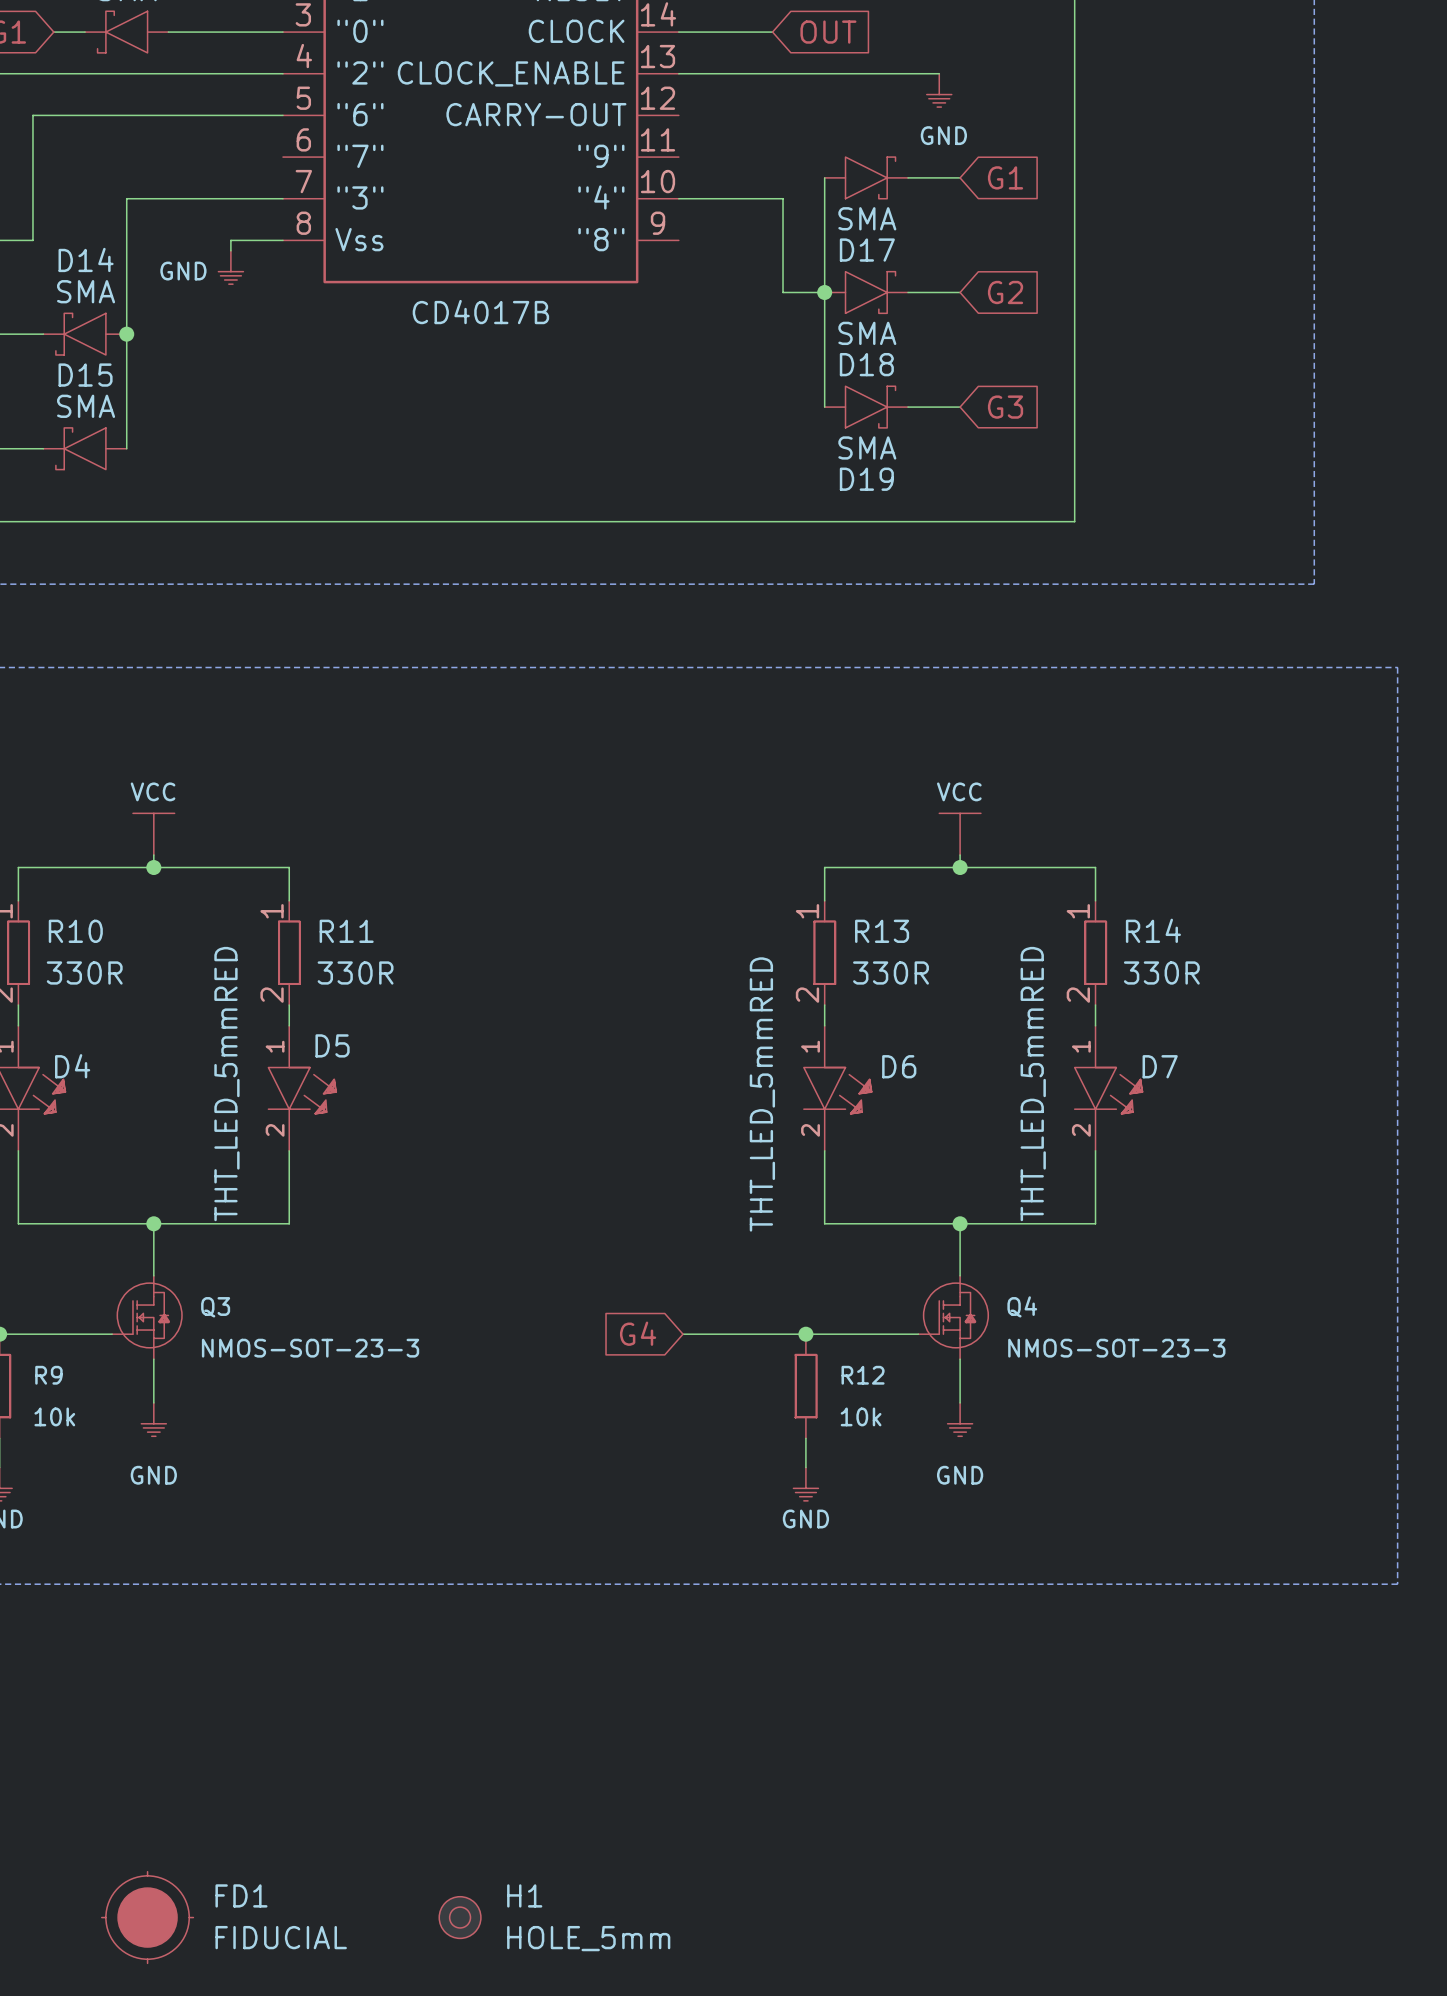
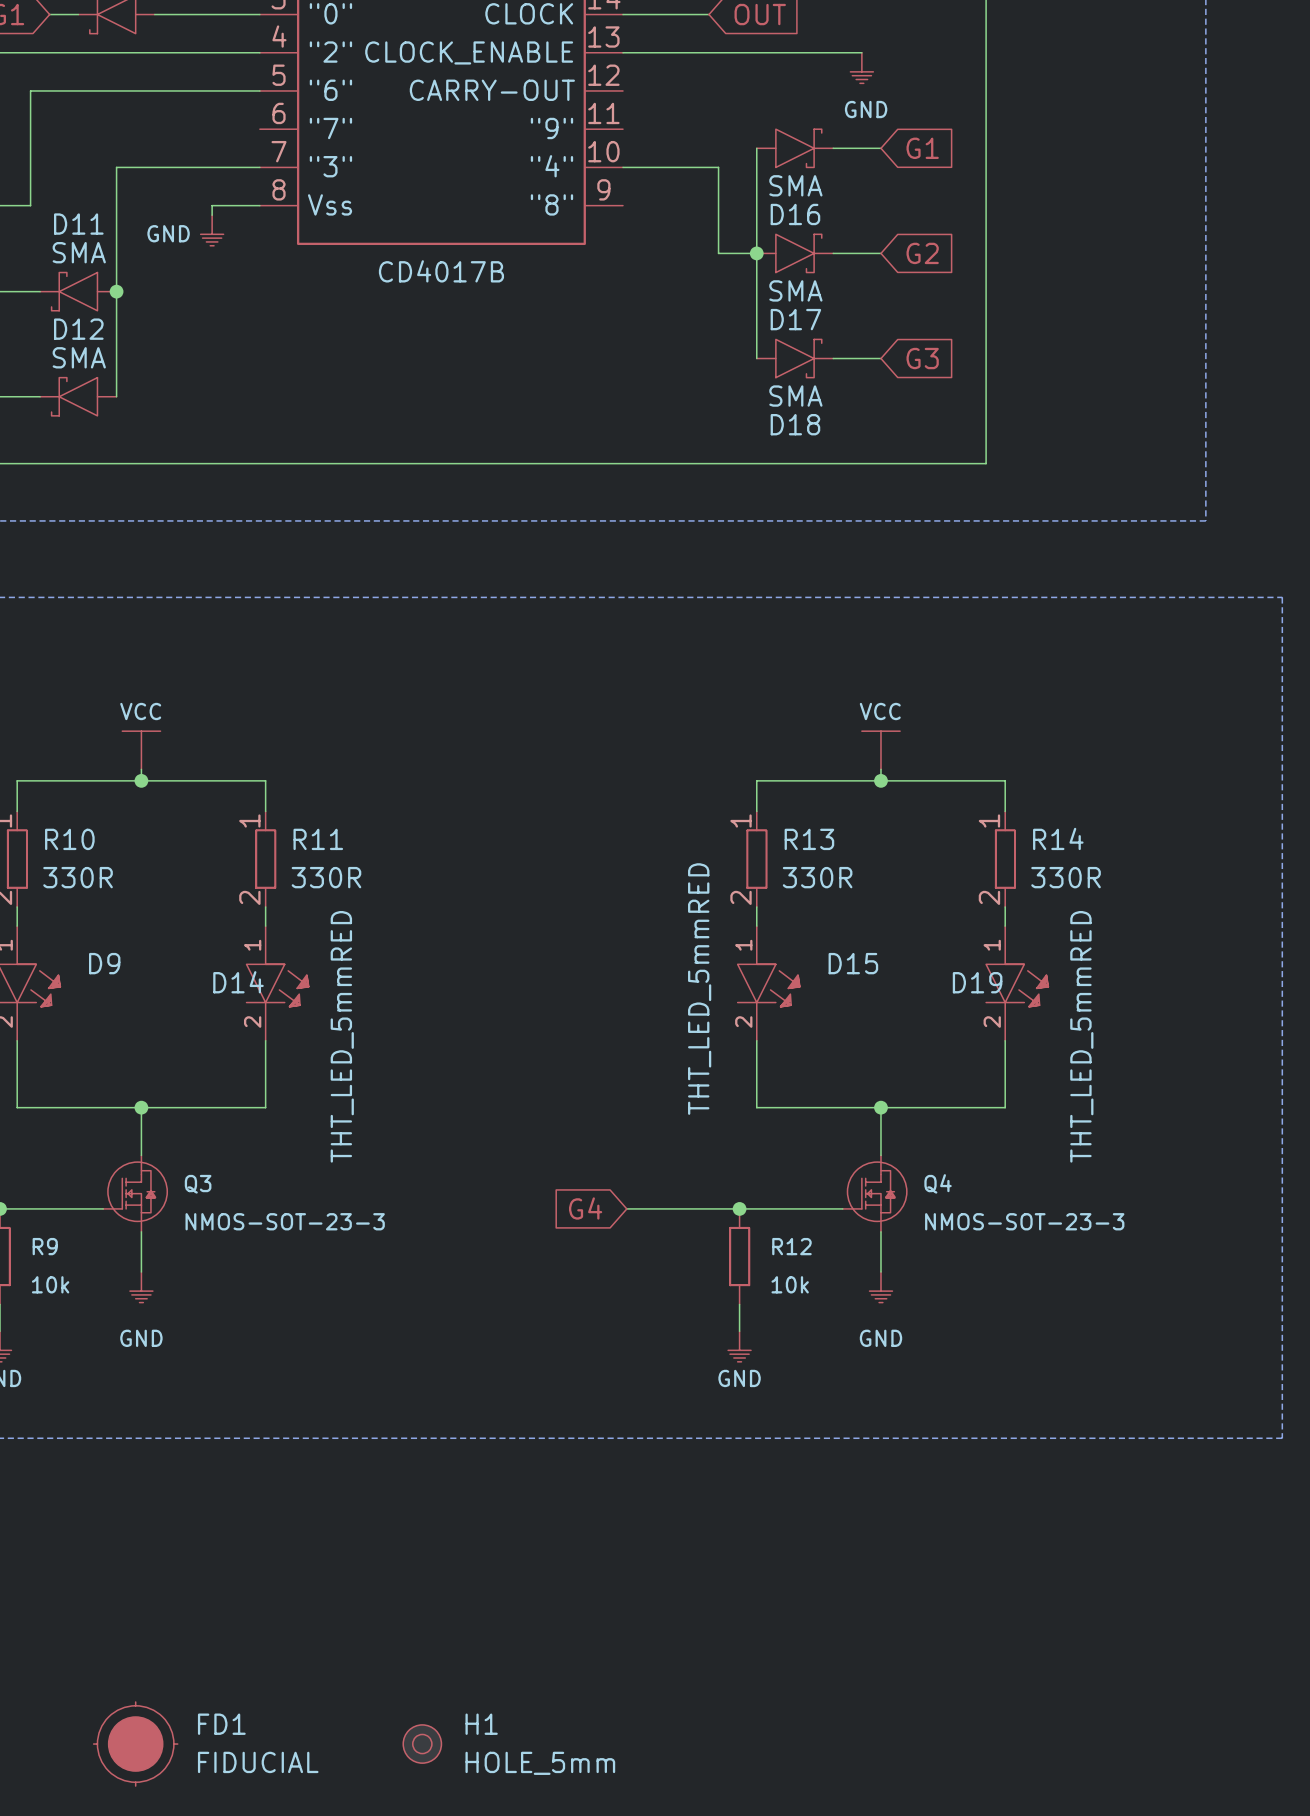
D17 name: D17 (867, 250) -> D16 (795, 214)
D14 name: D14 (86, 259) -> D11 (78, 224)
D18 name: D18 (866, 364) -> D17 (795, 319)
D15 name: D15 (85, 375) -> D12 (78, 329)
D19 name: D19 (866, 479) -> D18 (795, 424)
D5 name: D5 (332, 1045) -> D14 (238, 982)
D4 name: D4 (72, 1066) -> D9 (104, 963)
D6 name: D6 (899, 1066) -> D15 (853, 963)
D7 name: D7 (1160, 1066) -> D19 (977, 982)
D5 value position: THT_LED_5mmRED (226, 1084) -> THT_LED_5mmRED (342, 1036)
D7 value position: THT_LED_5mmRED (1033, 1084) -> THT_LED_5mmRED (1081, 1036)

